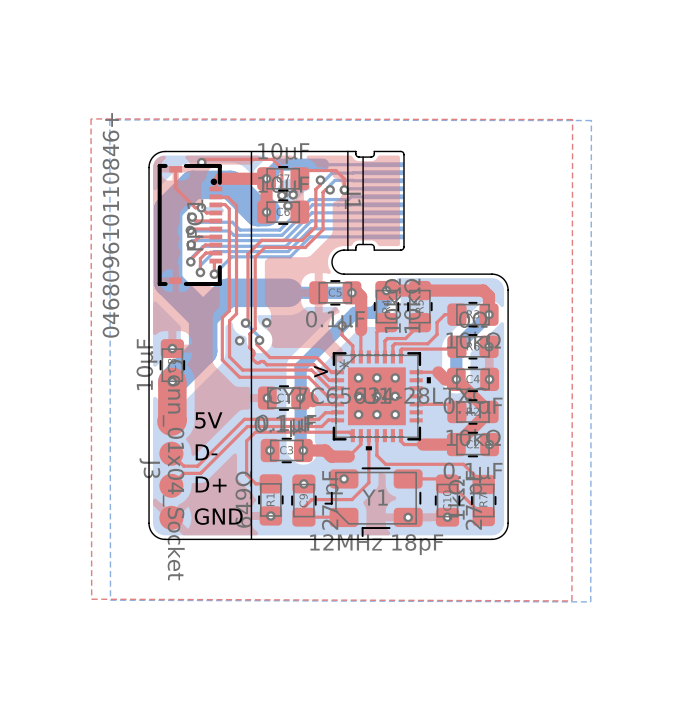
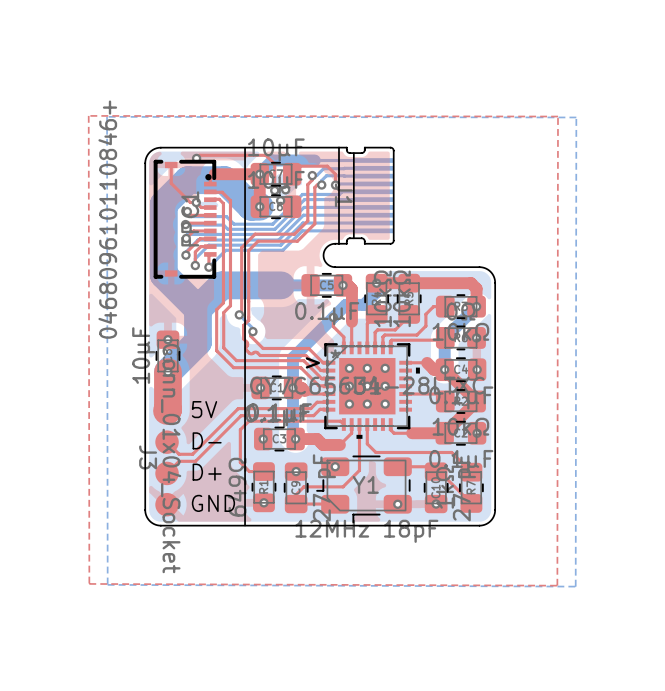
via: (266, 322) -> none
via: (239, 340) -> none

